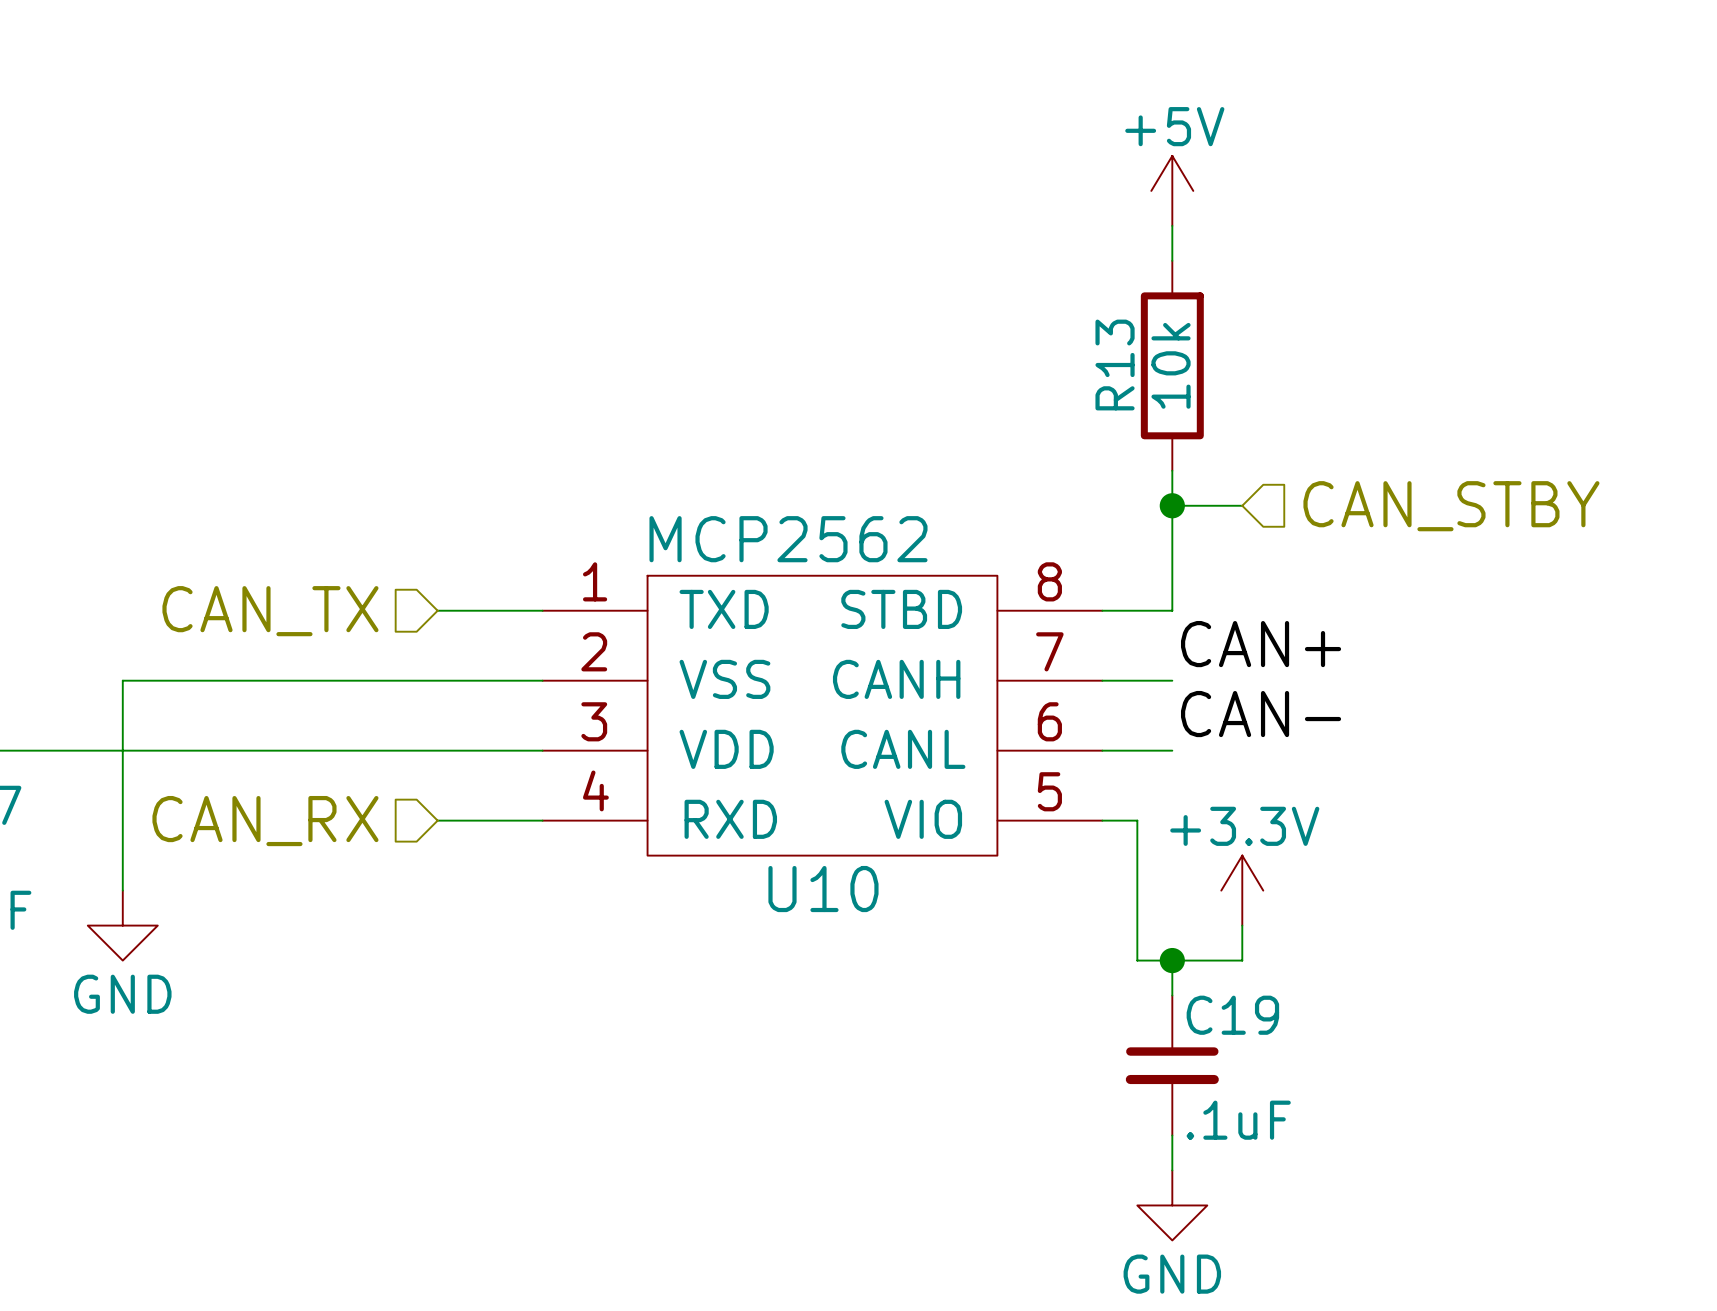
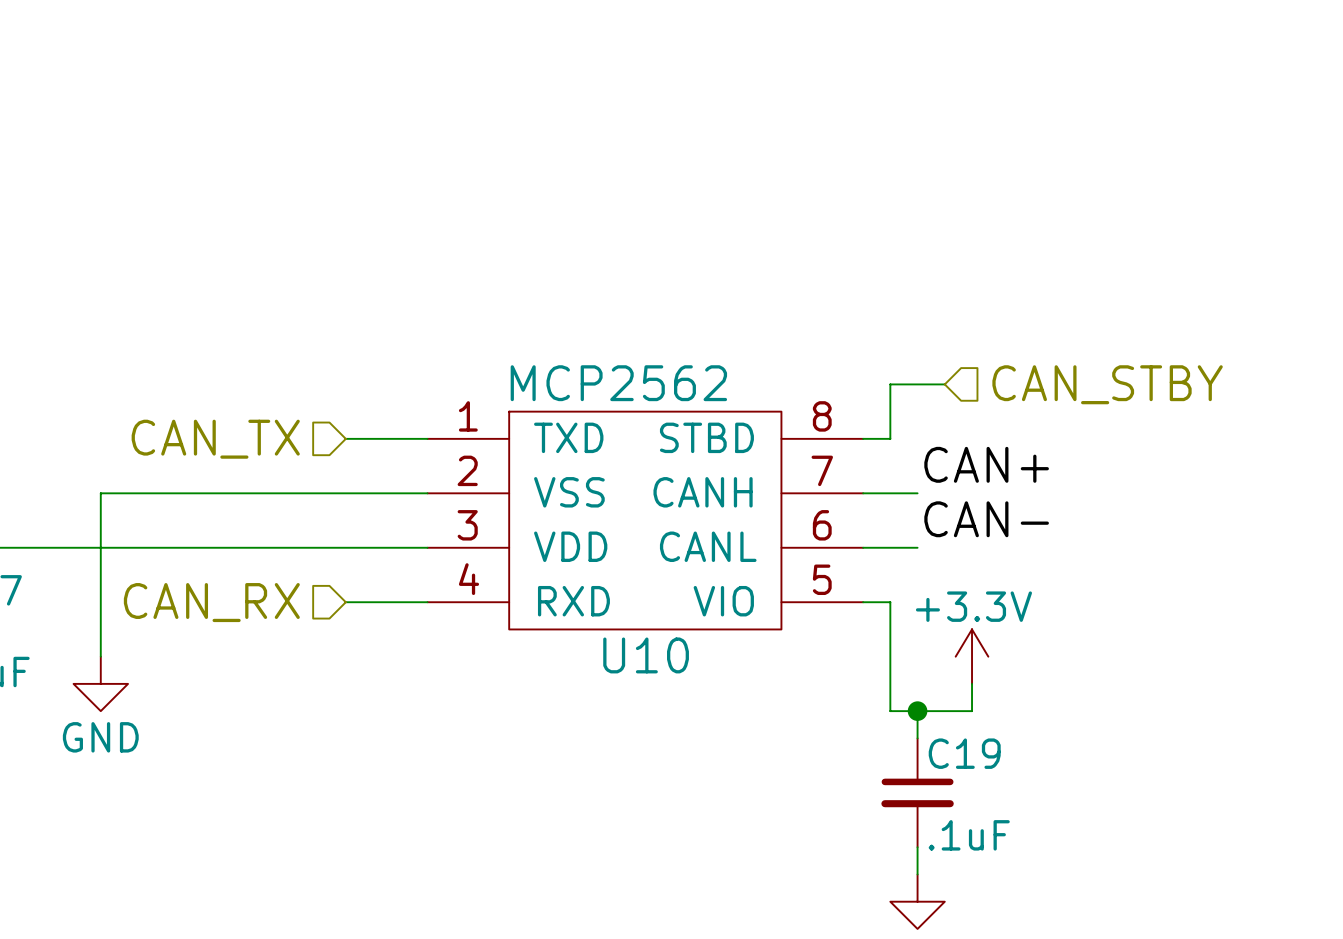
power symbol: +5V (1172, 190) -> none
wire: (1172, 225) (1172, 260) -> none
R13: 10k (1172, 365) -> none
wire: (1172, 470) (1172, 610) (1137, 610) -> (944, 384) (890, 384) (890, 438)
wire: (1172, 505) (1242, 505) -> none
junction: (1172, 505) -> none
hierarchical label position: CAN_STBY (1451, 506) -> CAN_STBY (1107, 384)

